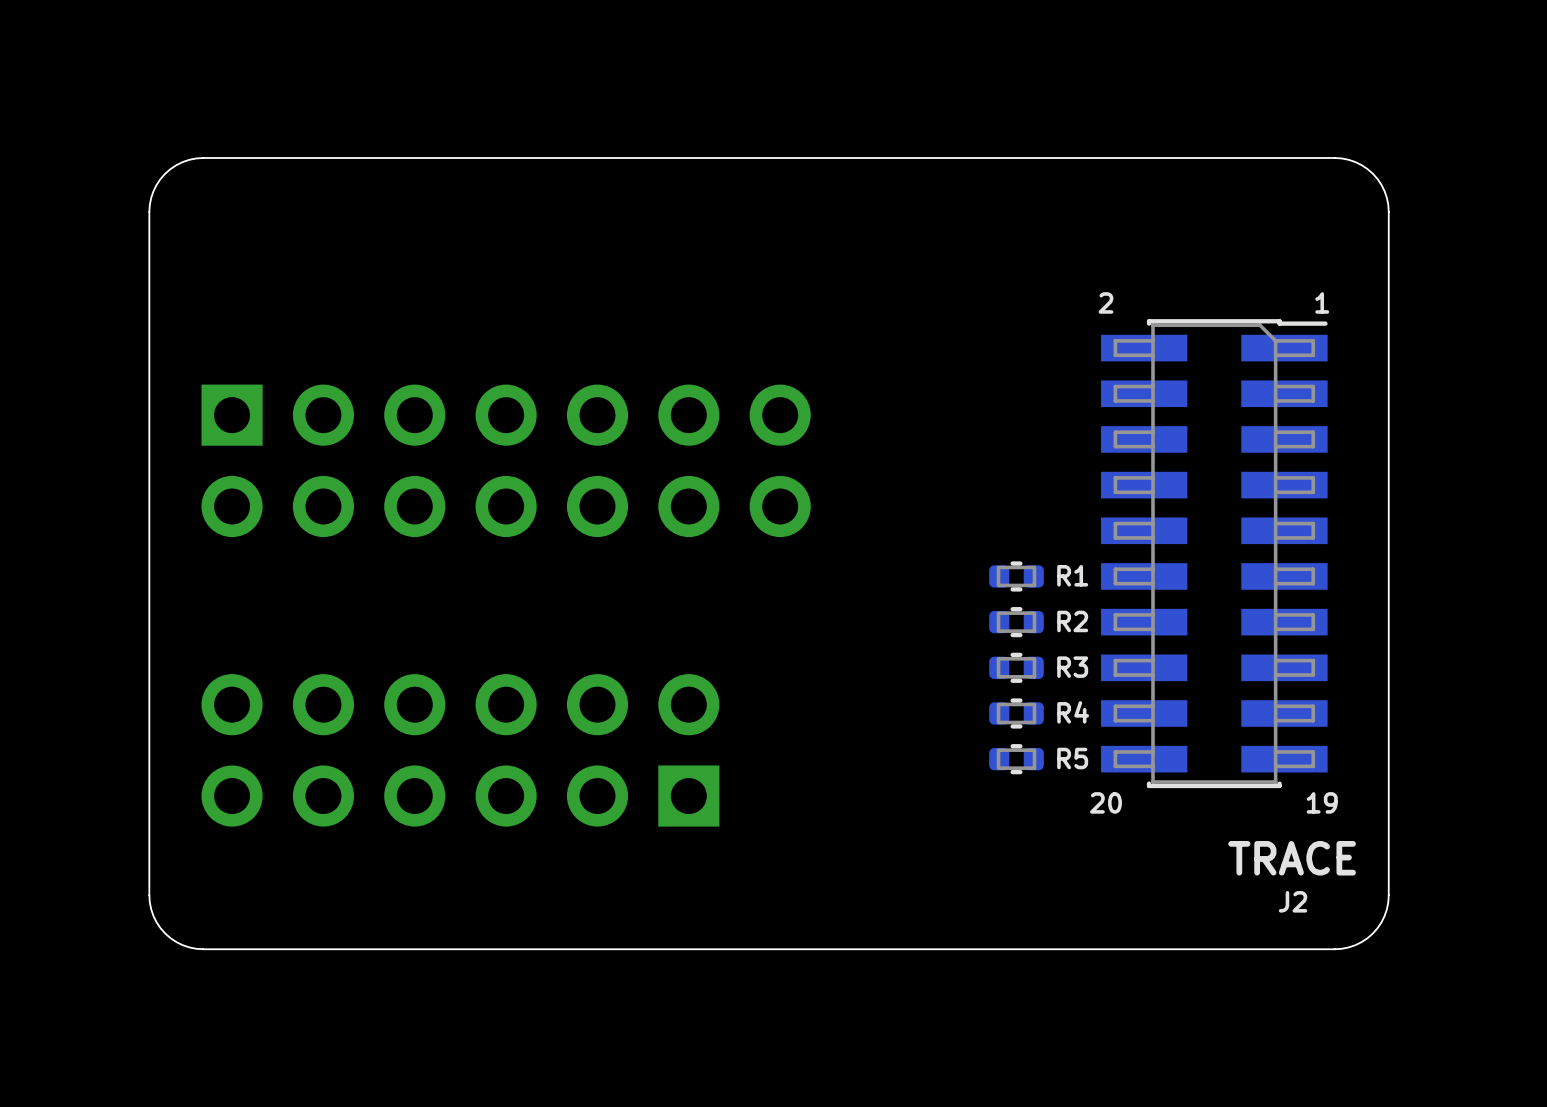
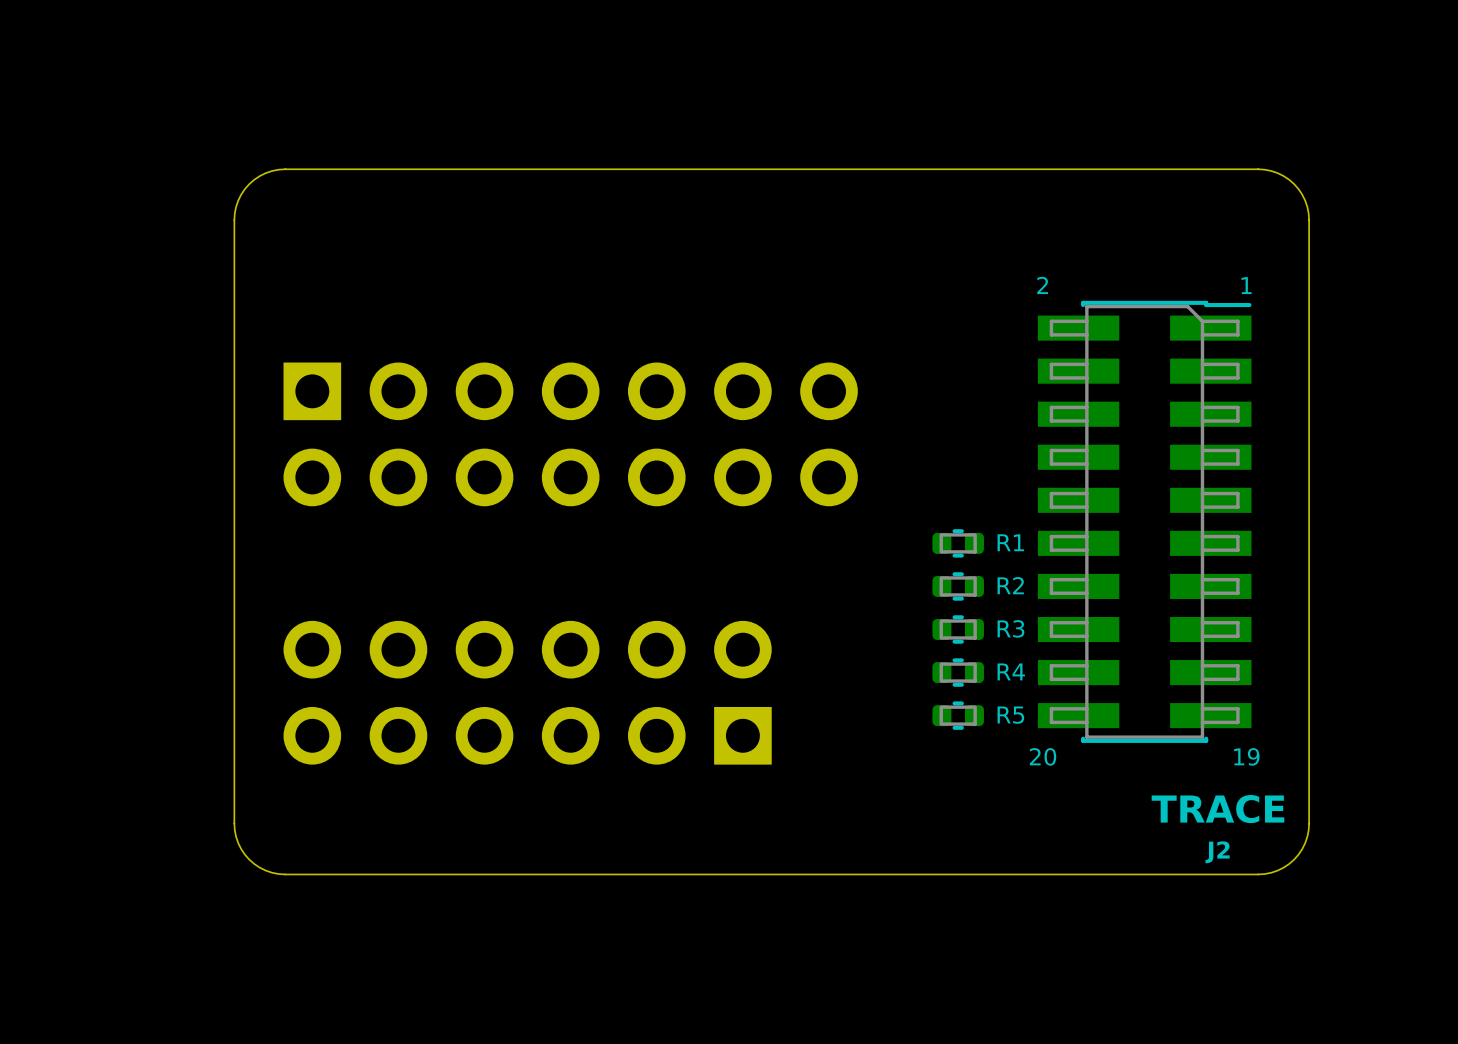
board edge: (1388, 233) (1386, 197) (1377, 179) (1361, 165) (1348, 159) (1334, 157) (203, 157) (182, 162) (165, 173) (153, 191) (149, 211) (149, 895) (151, 909) (156, 922) (165, 933) (176, 942) (189, 947) (203, 949) (1334, 949) (1355, 945) (1367, 938) (1377, 928) (1386, 909) (1388, 873) -> (1309, 220) (1305, 200) (1294, 184) (1277, 173) (1258, 169) (285, 169) (265, 173) (249, 184) (238, 200) (234, 220) (234, 823) (236, 836) (241, 849) (249, 859) (259, 867) (272, 872) (285, 874) (1258, 874) (1277, 870) (1294, 859) (1305, 843) (1309, 823)
part position: (506, 460) -> (570, 434)
part position: (460, 750) -> (527, 692)

